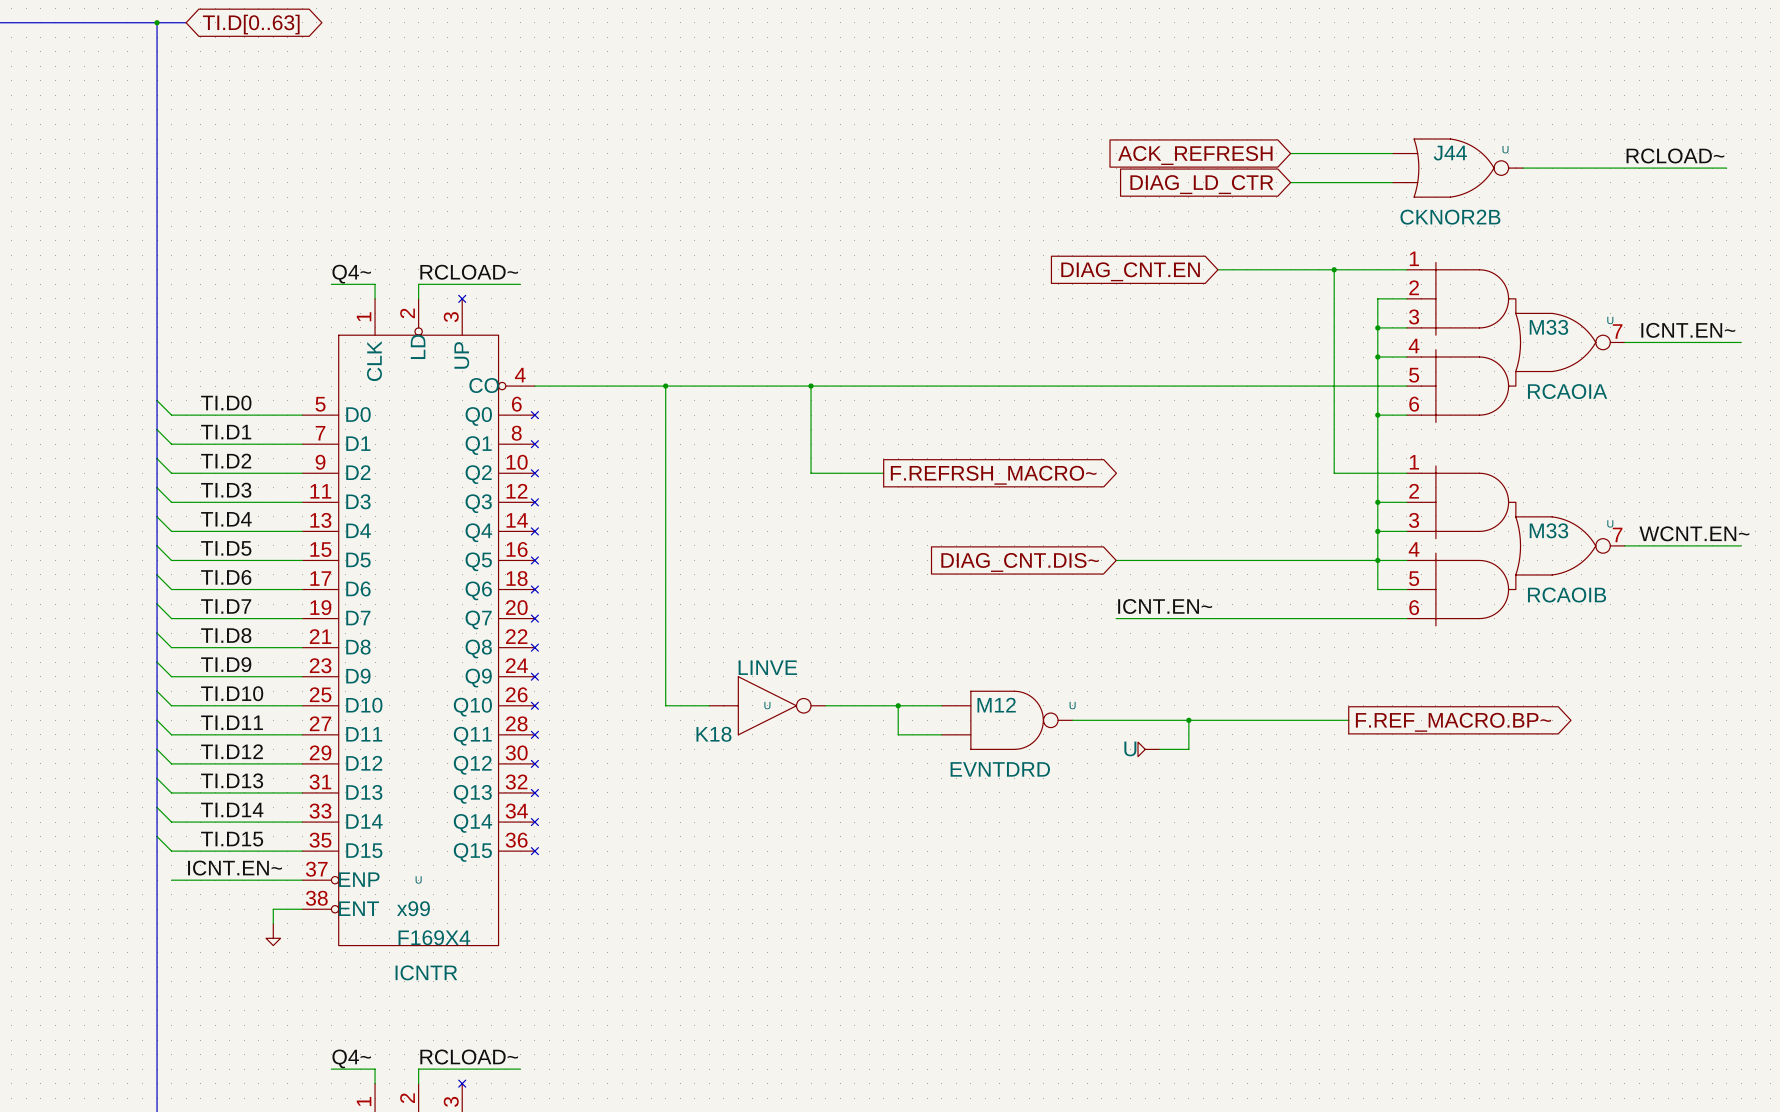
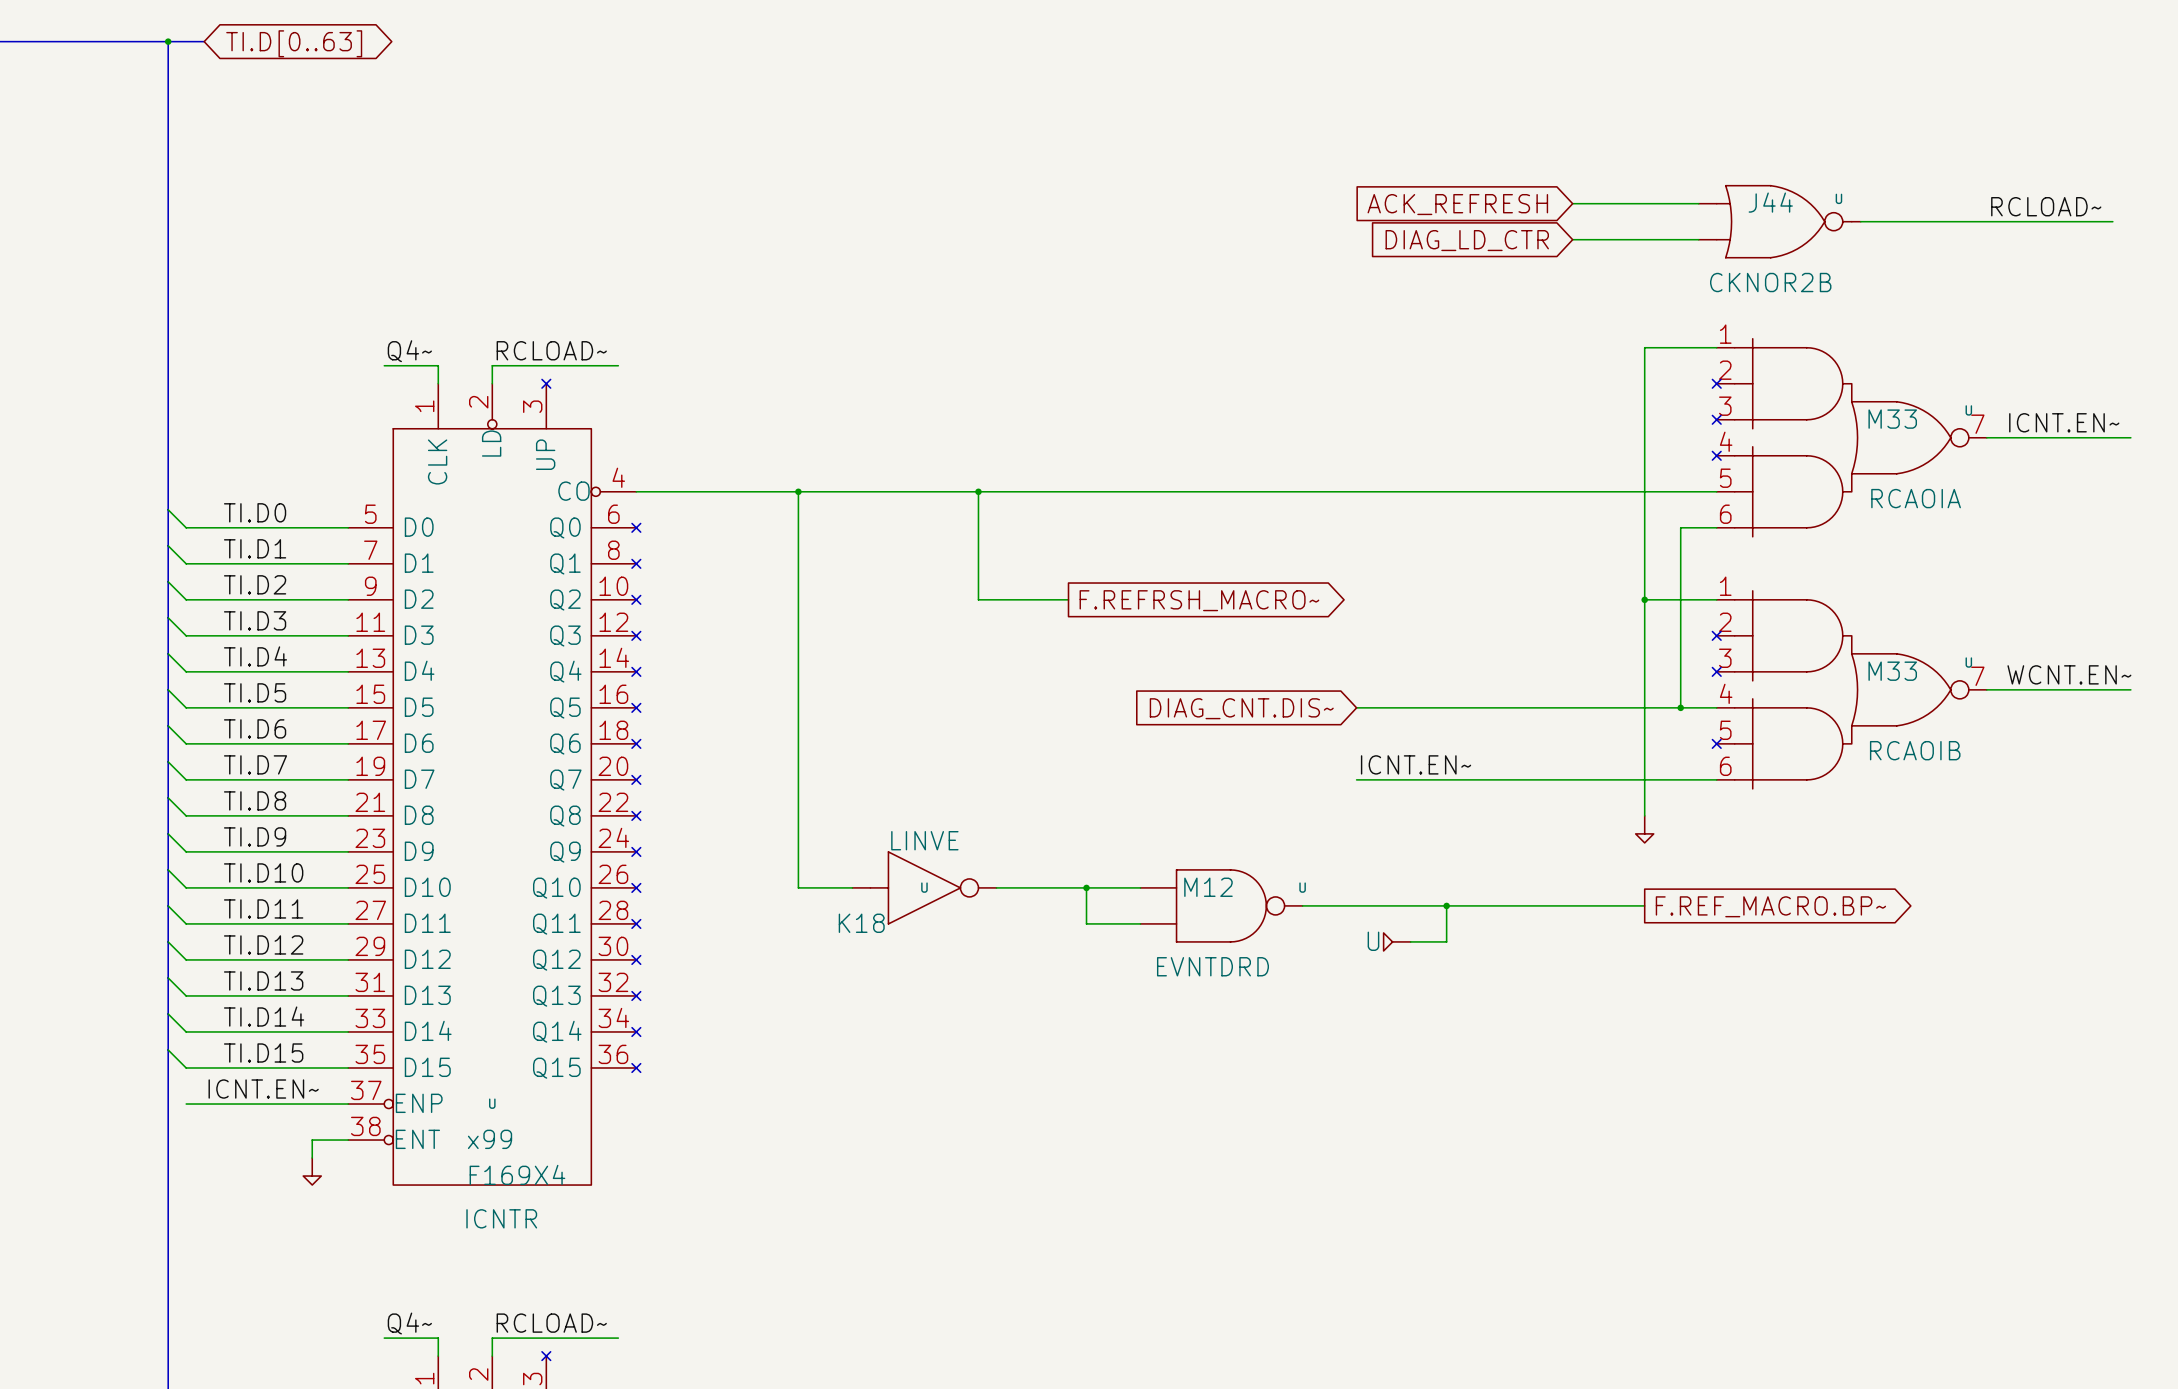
wire: (1217, 269) (1348, 269) -> (1644, 815) (1644, 347)
wire: (1334, 269) (1334, 473) (1348, 473) -> none
junction: (1334, 269) -> none
global label: DIAG_CNT.EN (1130, 271) -> none
wire: (1406, 298) (1377, 298) (1377, 415) -> none
no-connect mark: none -> (1716, 383)
wire: (1377, 327) (1406, 327) -> none
junction: (1377, 327) -> none
no-connect mark: none -> (1716, 419)
wire: (1377, 357) (1406, 357) -> none
junction: (1377, 357) -> none
no-connect mark: none -> (1716, 455)
junction: (1377, 415) -> none
junction: none -> (1644, 599)
wire: (1377, 502) (1406, 502) -> none
junction: (1377, 502) -> none
no-connect mark: none -> (1716, 635)
wire: (1377, 531) (1406, 531) -> none
junction: (1377, 531) -> none
no-connect mark: none -> (1716, 671)
wire: (1377, 560) (1377, 589) (1406, 589) -> none
no-connect mark: none -> (1716, 743)
power symbol: none -> (1644, 829)

